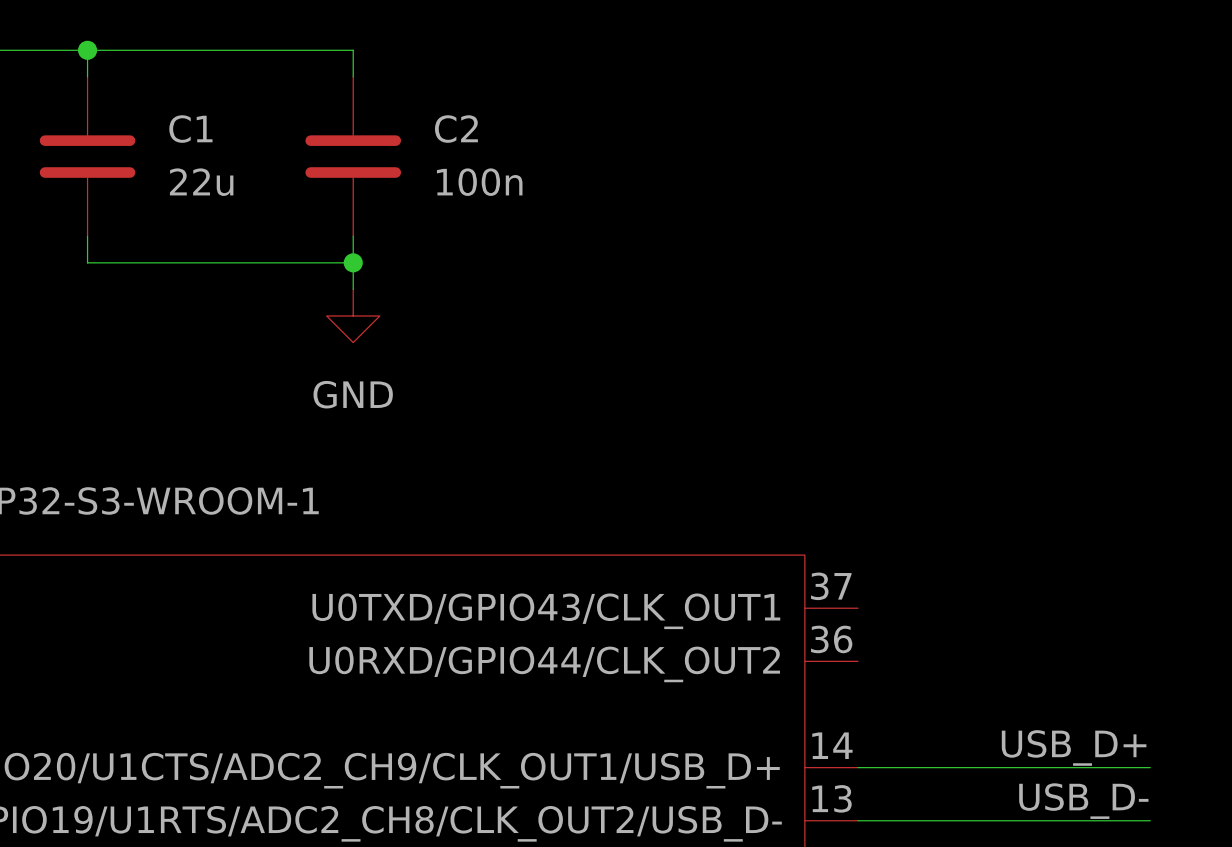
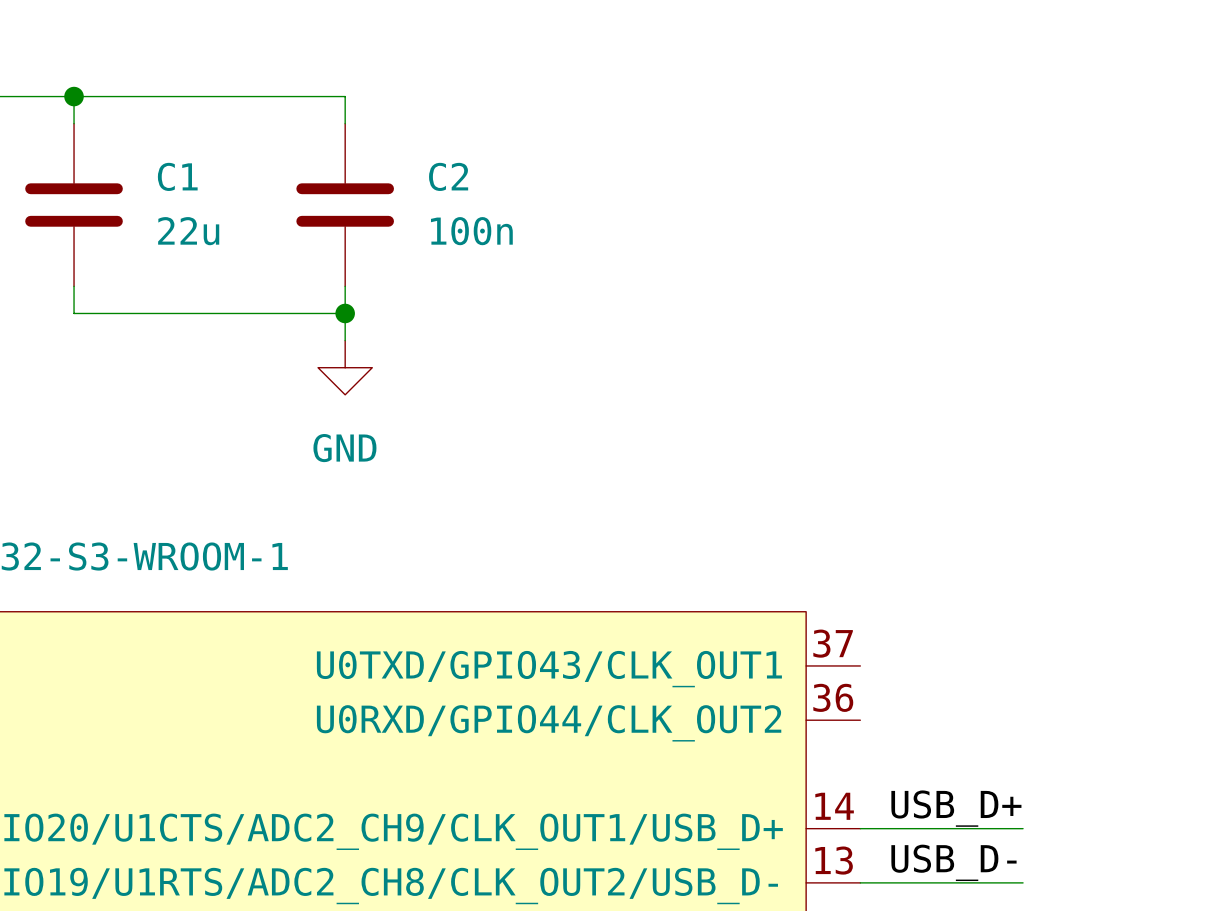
label position: USB_D+ (1074, 747) -> USB_D+ (956, 808)
wire: (1017, 767) (1150, 767) -> none
label position: USB_D- (1083, 801) -> USB_D- (953, 862)
wire: (1017, 820) (1150, 820) -> none

